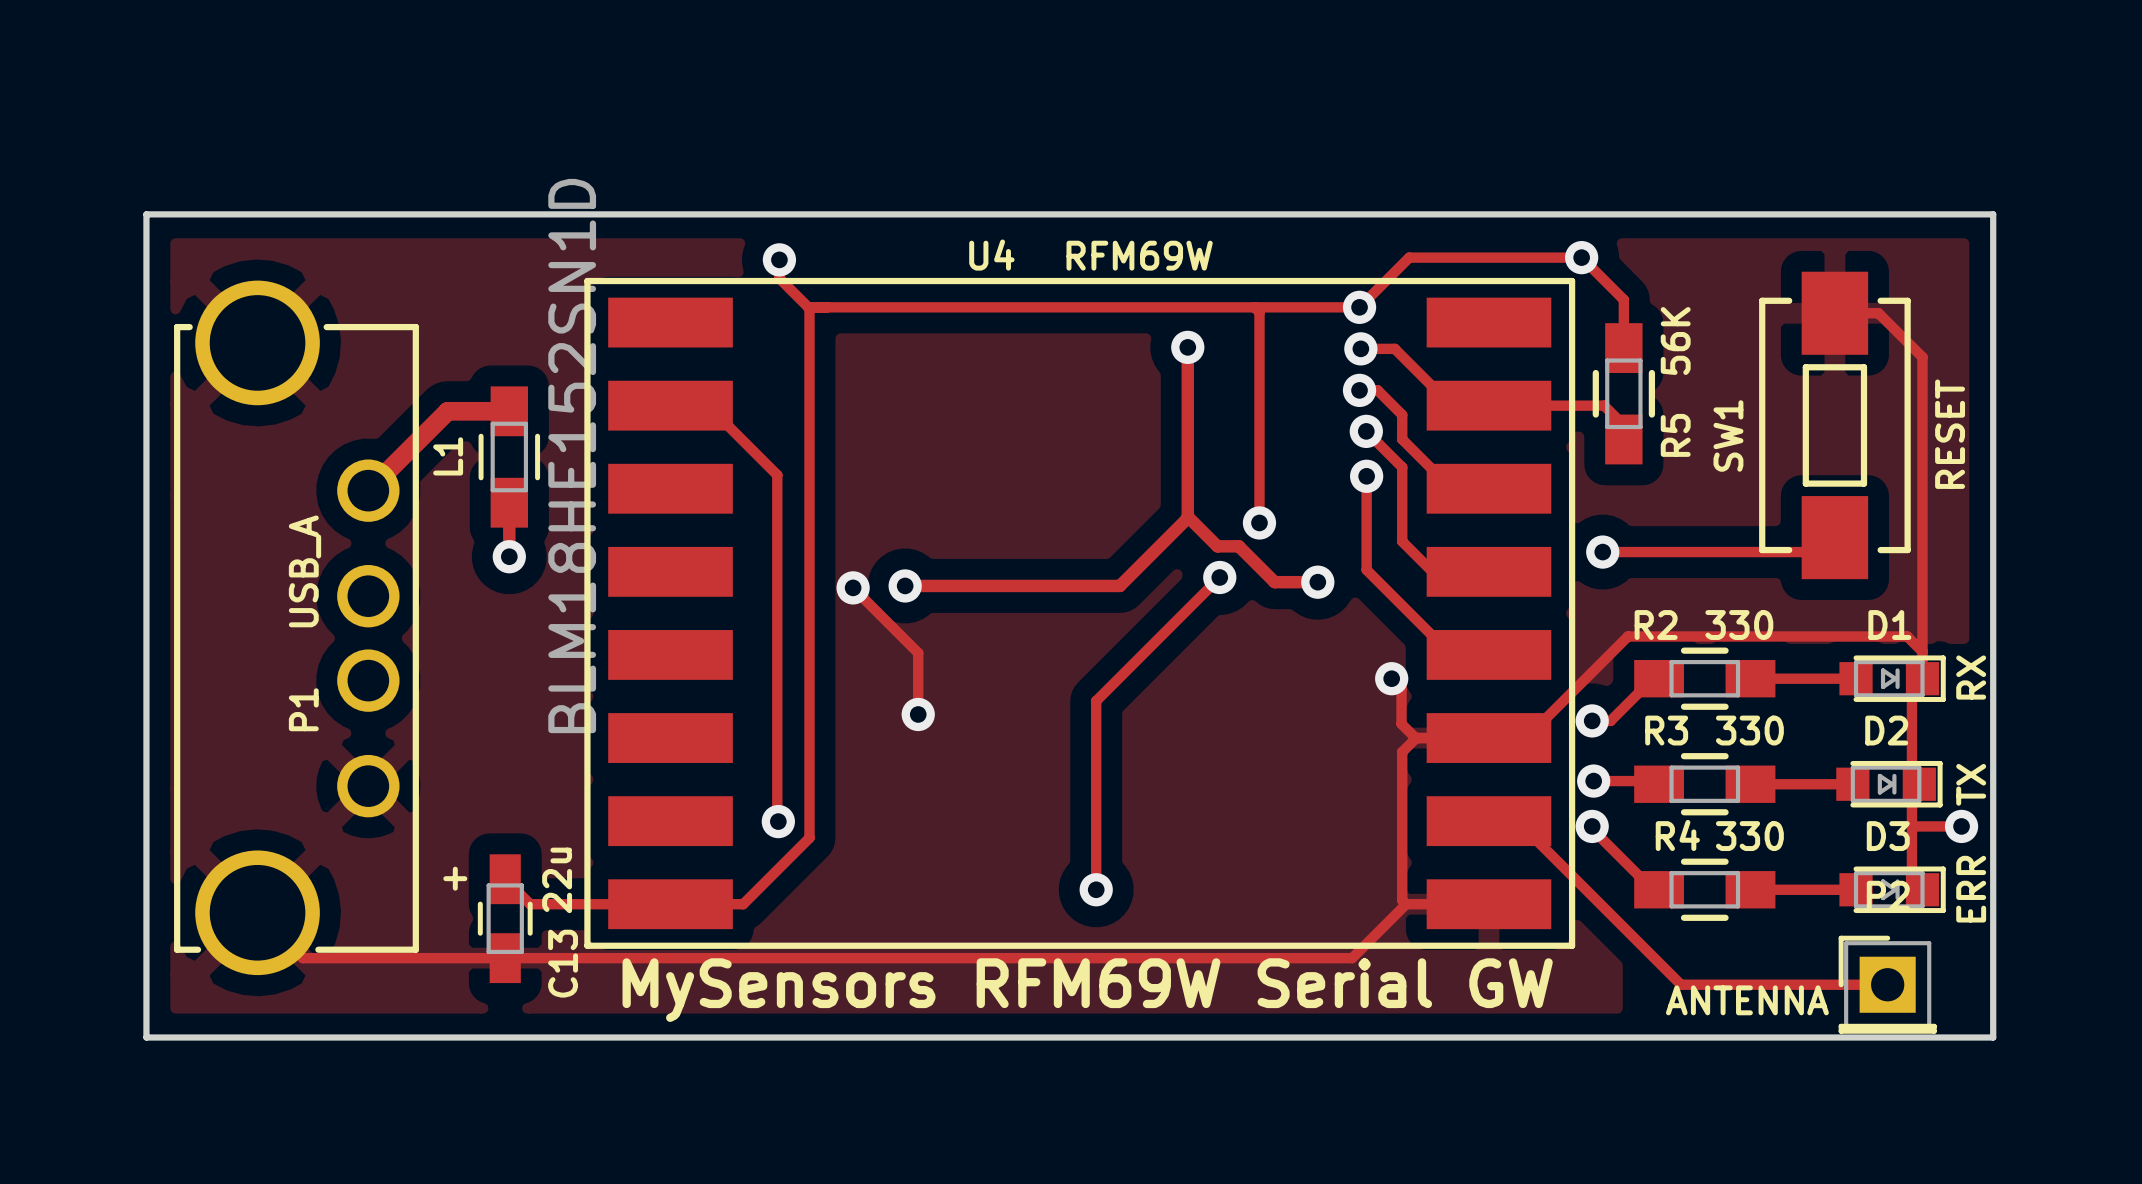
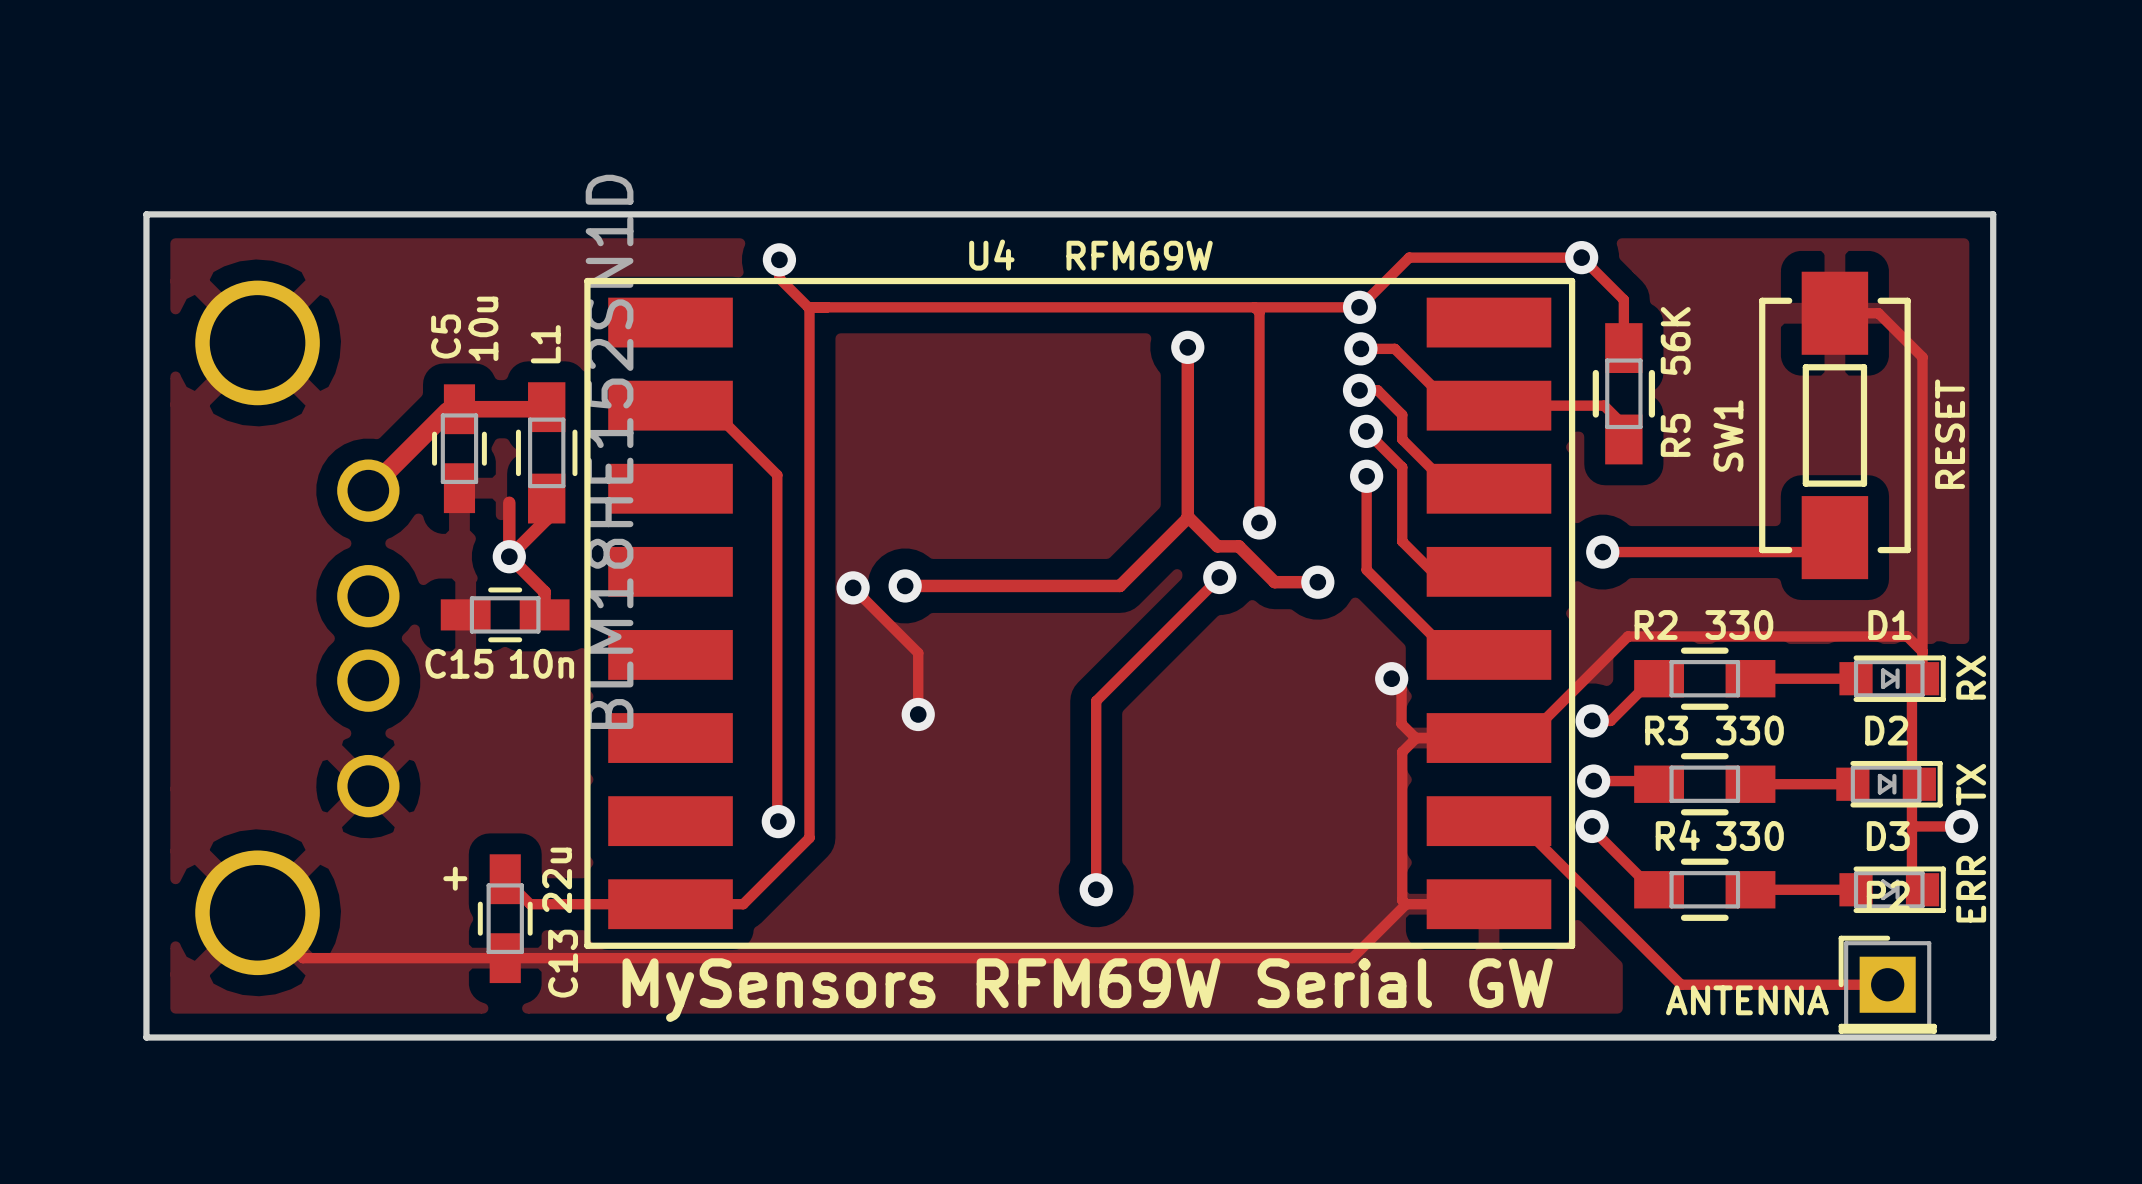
track: (447, 411) (509, 411) -> (447, 411) (449, 409) (544, 409) (546, 407)
C5: none -> 10u (459, 448)
L1 name position: L1 (448, 456) -> L1 (545, 344)
L1 position: (509, 457) -> (546, 452)
track: none -> (546, 498) (546, 519) (509, 556) (544, 592) (544, 614)
C15: none -> 10n (505, 614)
P1: USB_A (296, 627) -> none

